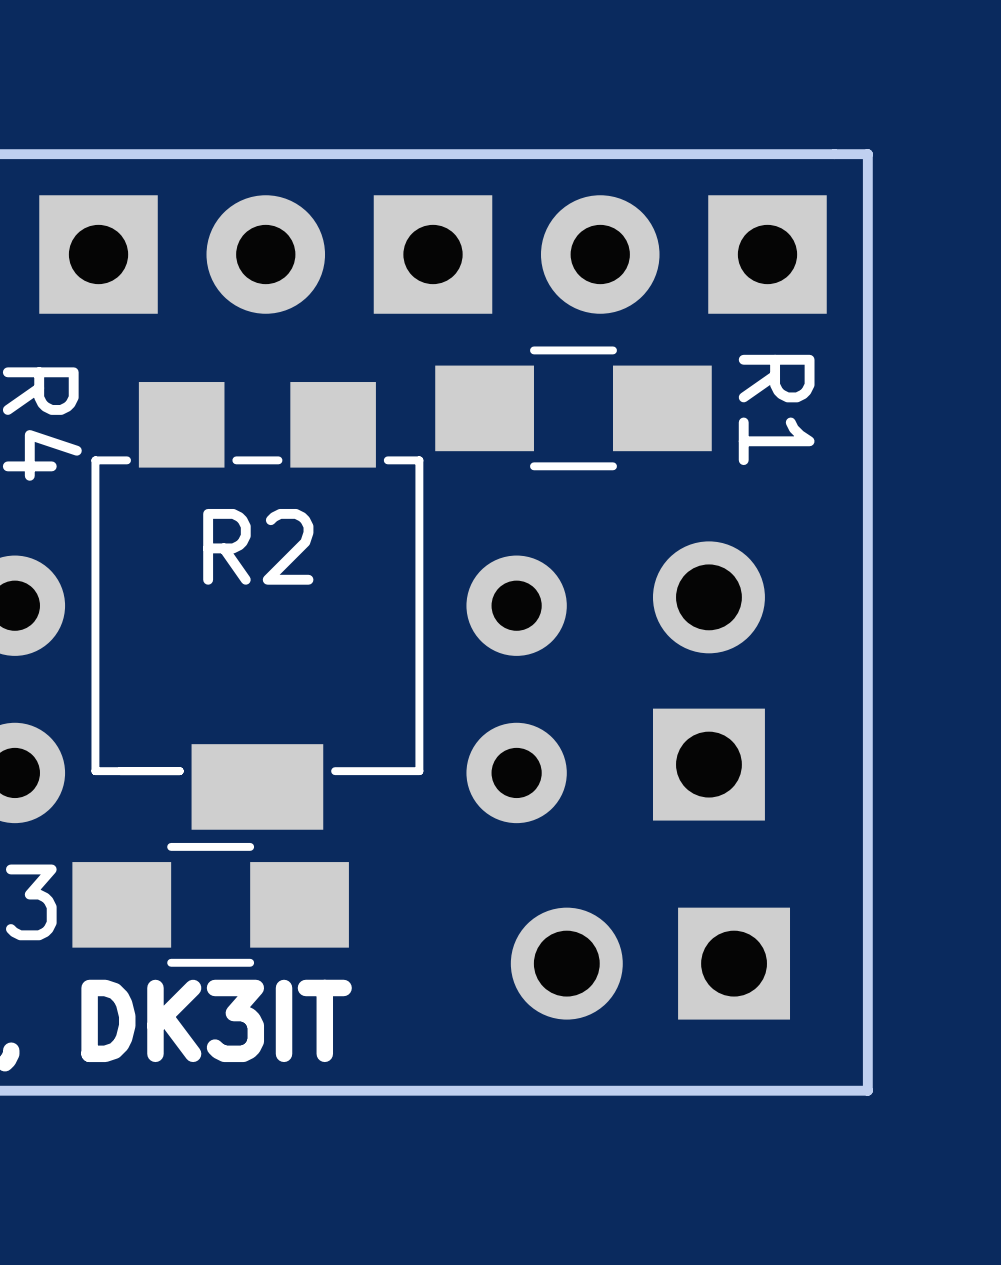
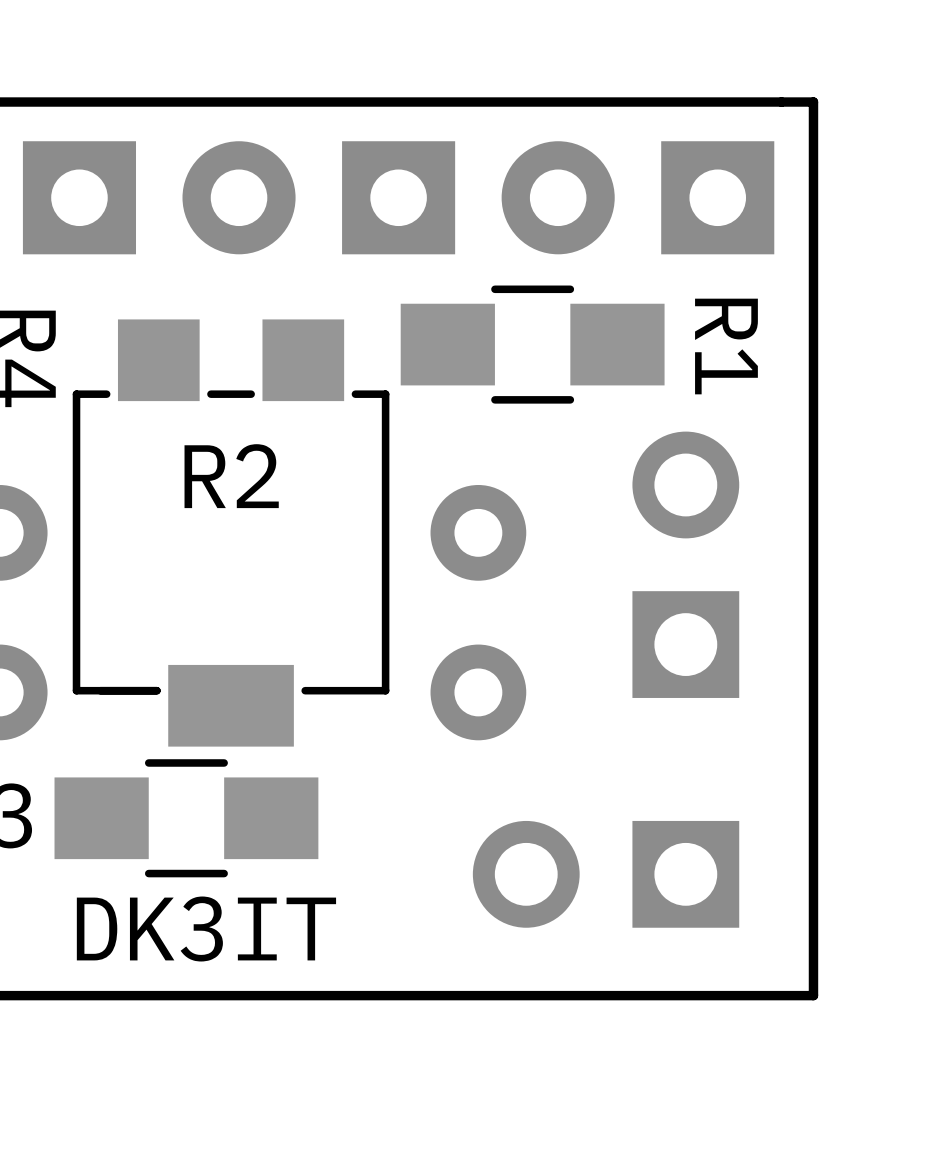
part position: (708, 680) -> (685, 564)

